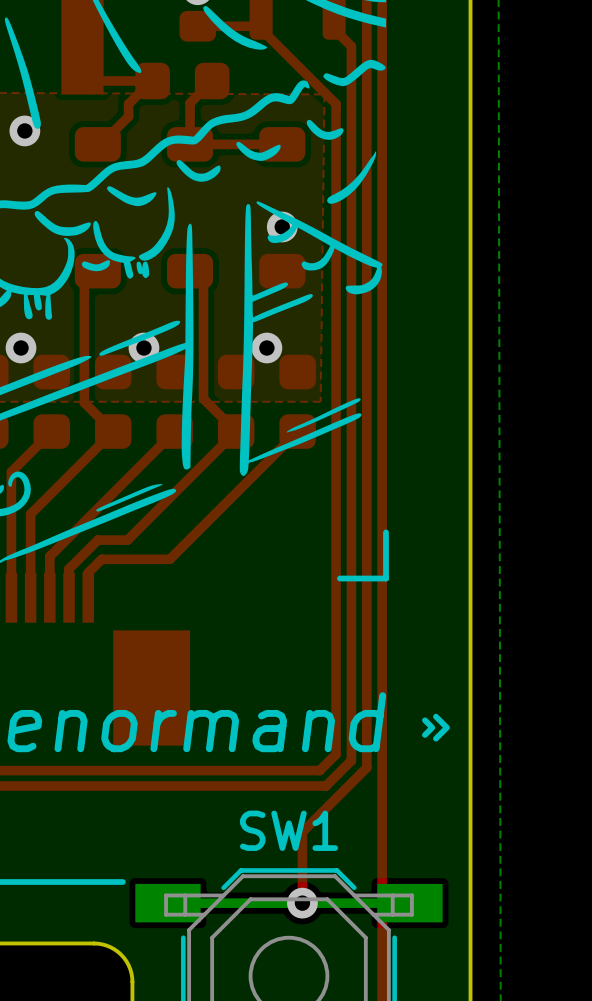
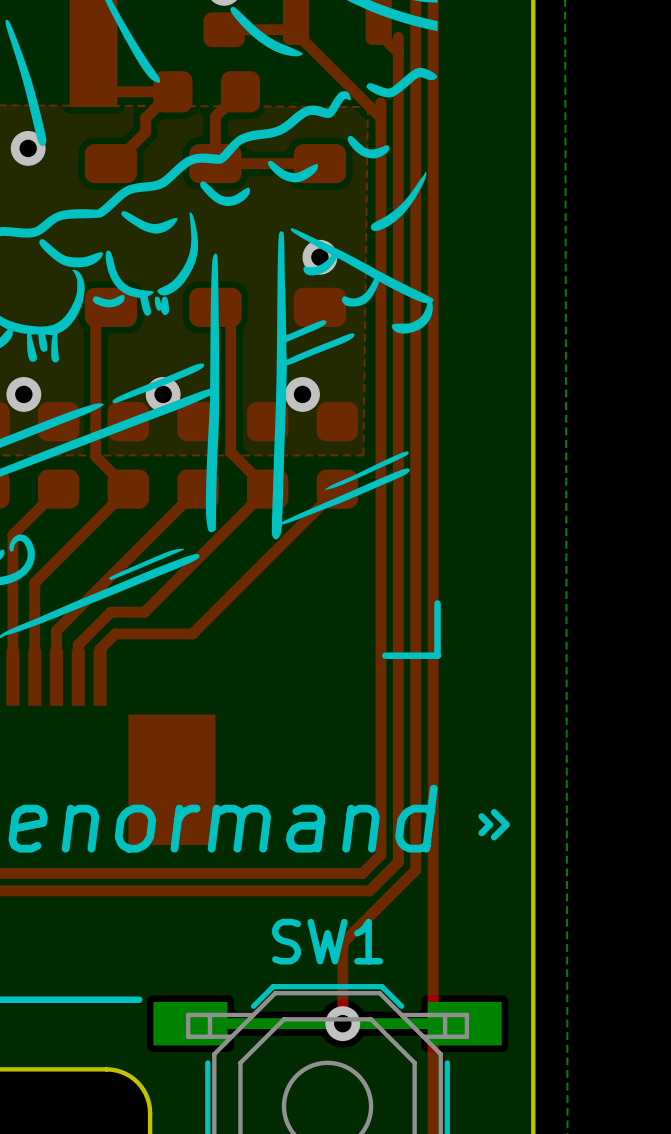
top track: none -> (398, 37) (398, 52)
top track: none -> (380, 102) (380, 117)

